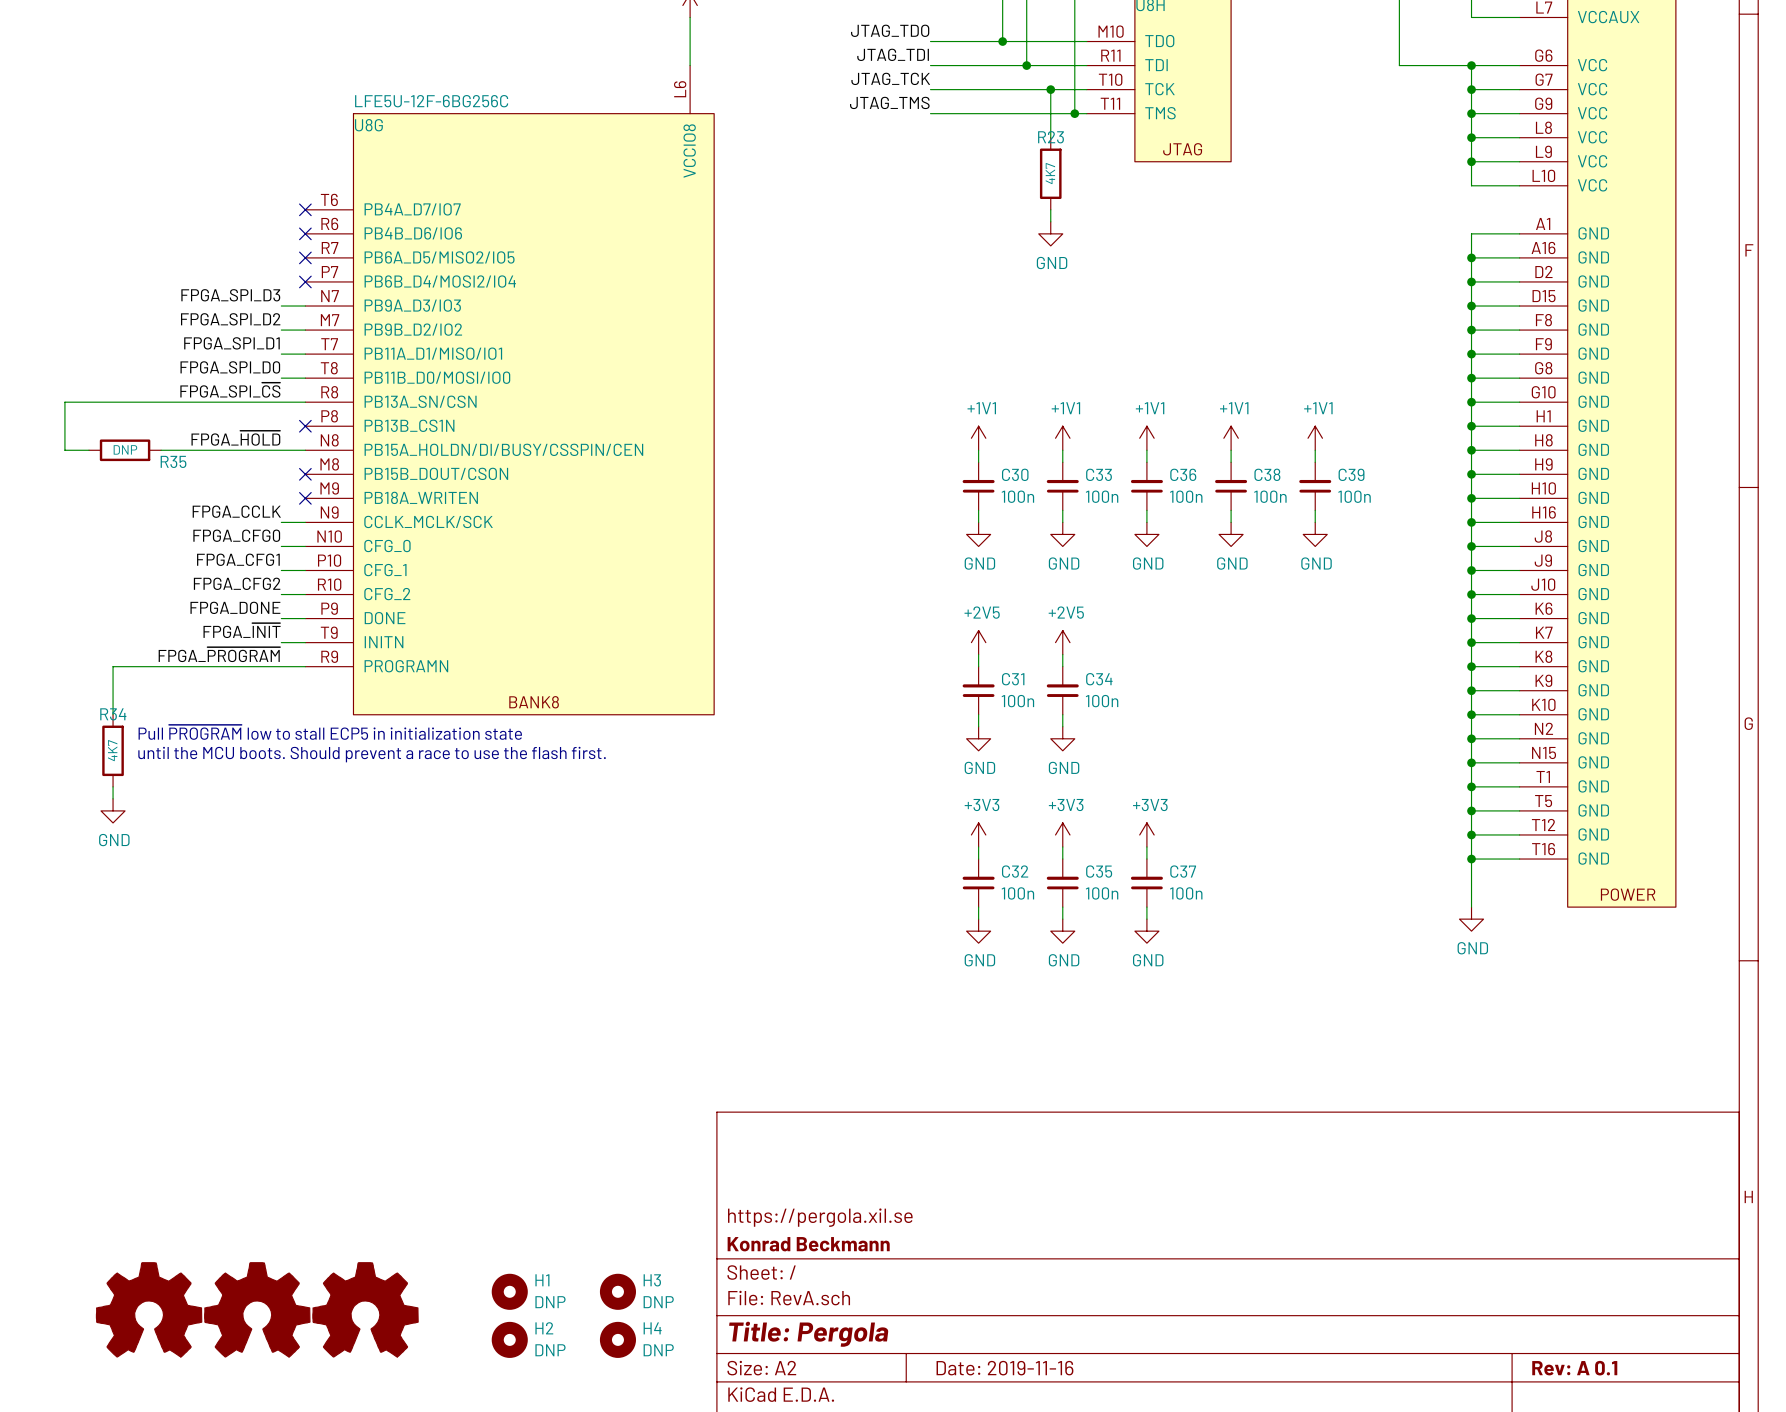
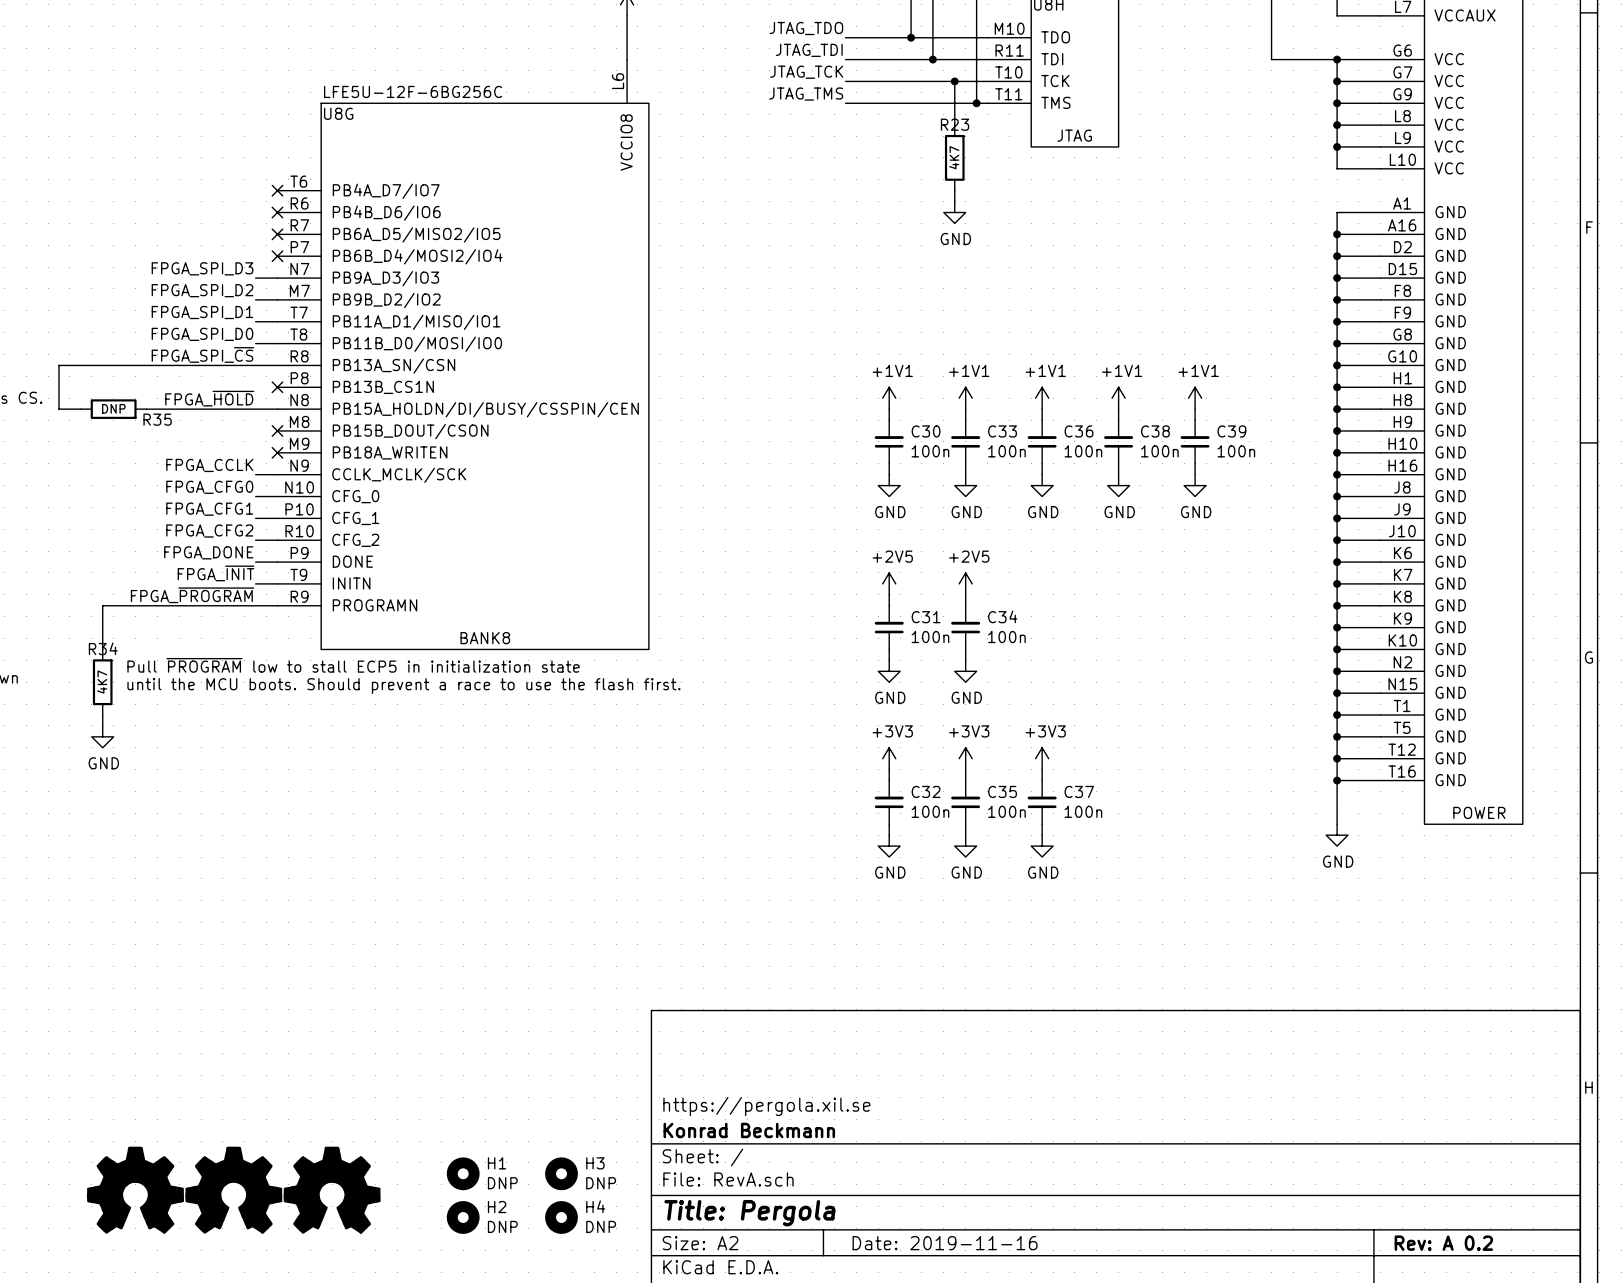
title block: Rev: A 0.1 (1574, 1368) -> Rev: A 0.2 (1443, 1243)

